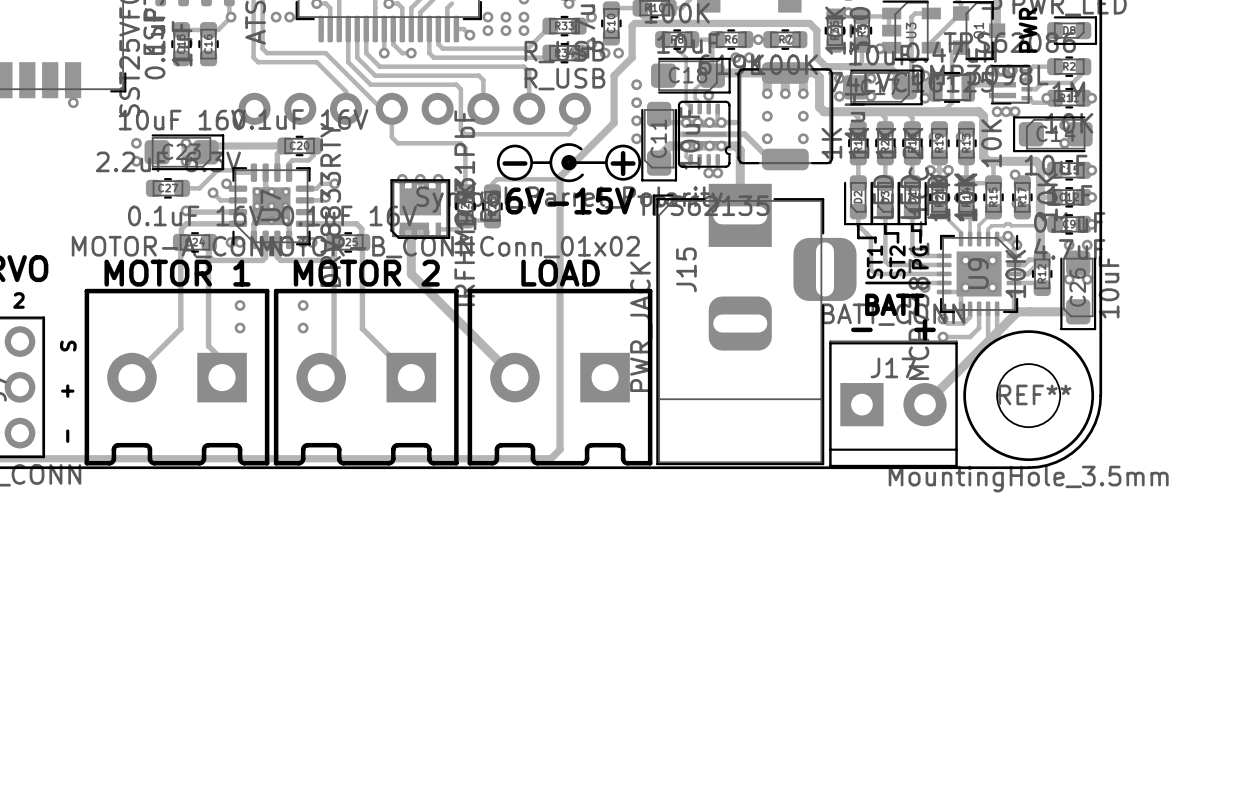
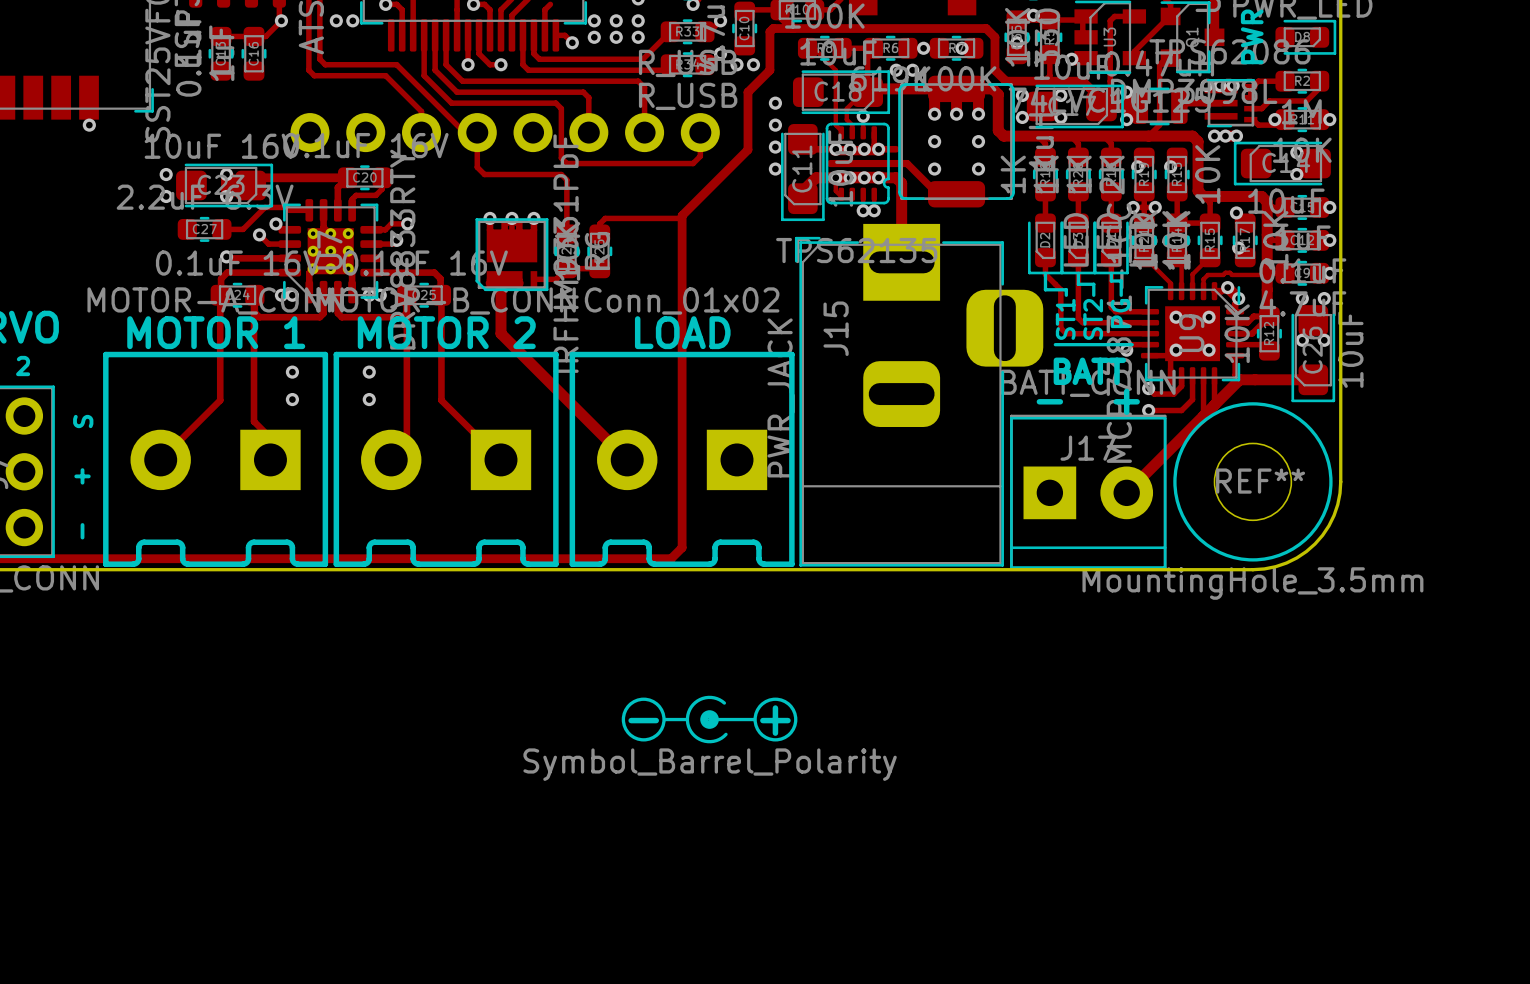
drawing position: (569, 162) -> (709, 719)
text position: - (514, 163) -> - (643, 720)
text position: + (623, 163) -> + (775, 720)
text: 6V-15V (570, 201) -> none

